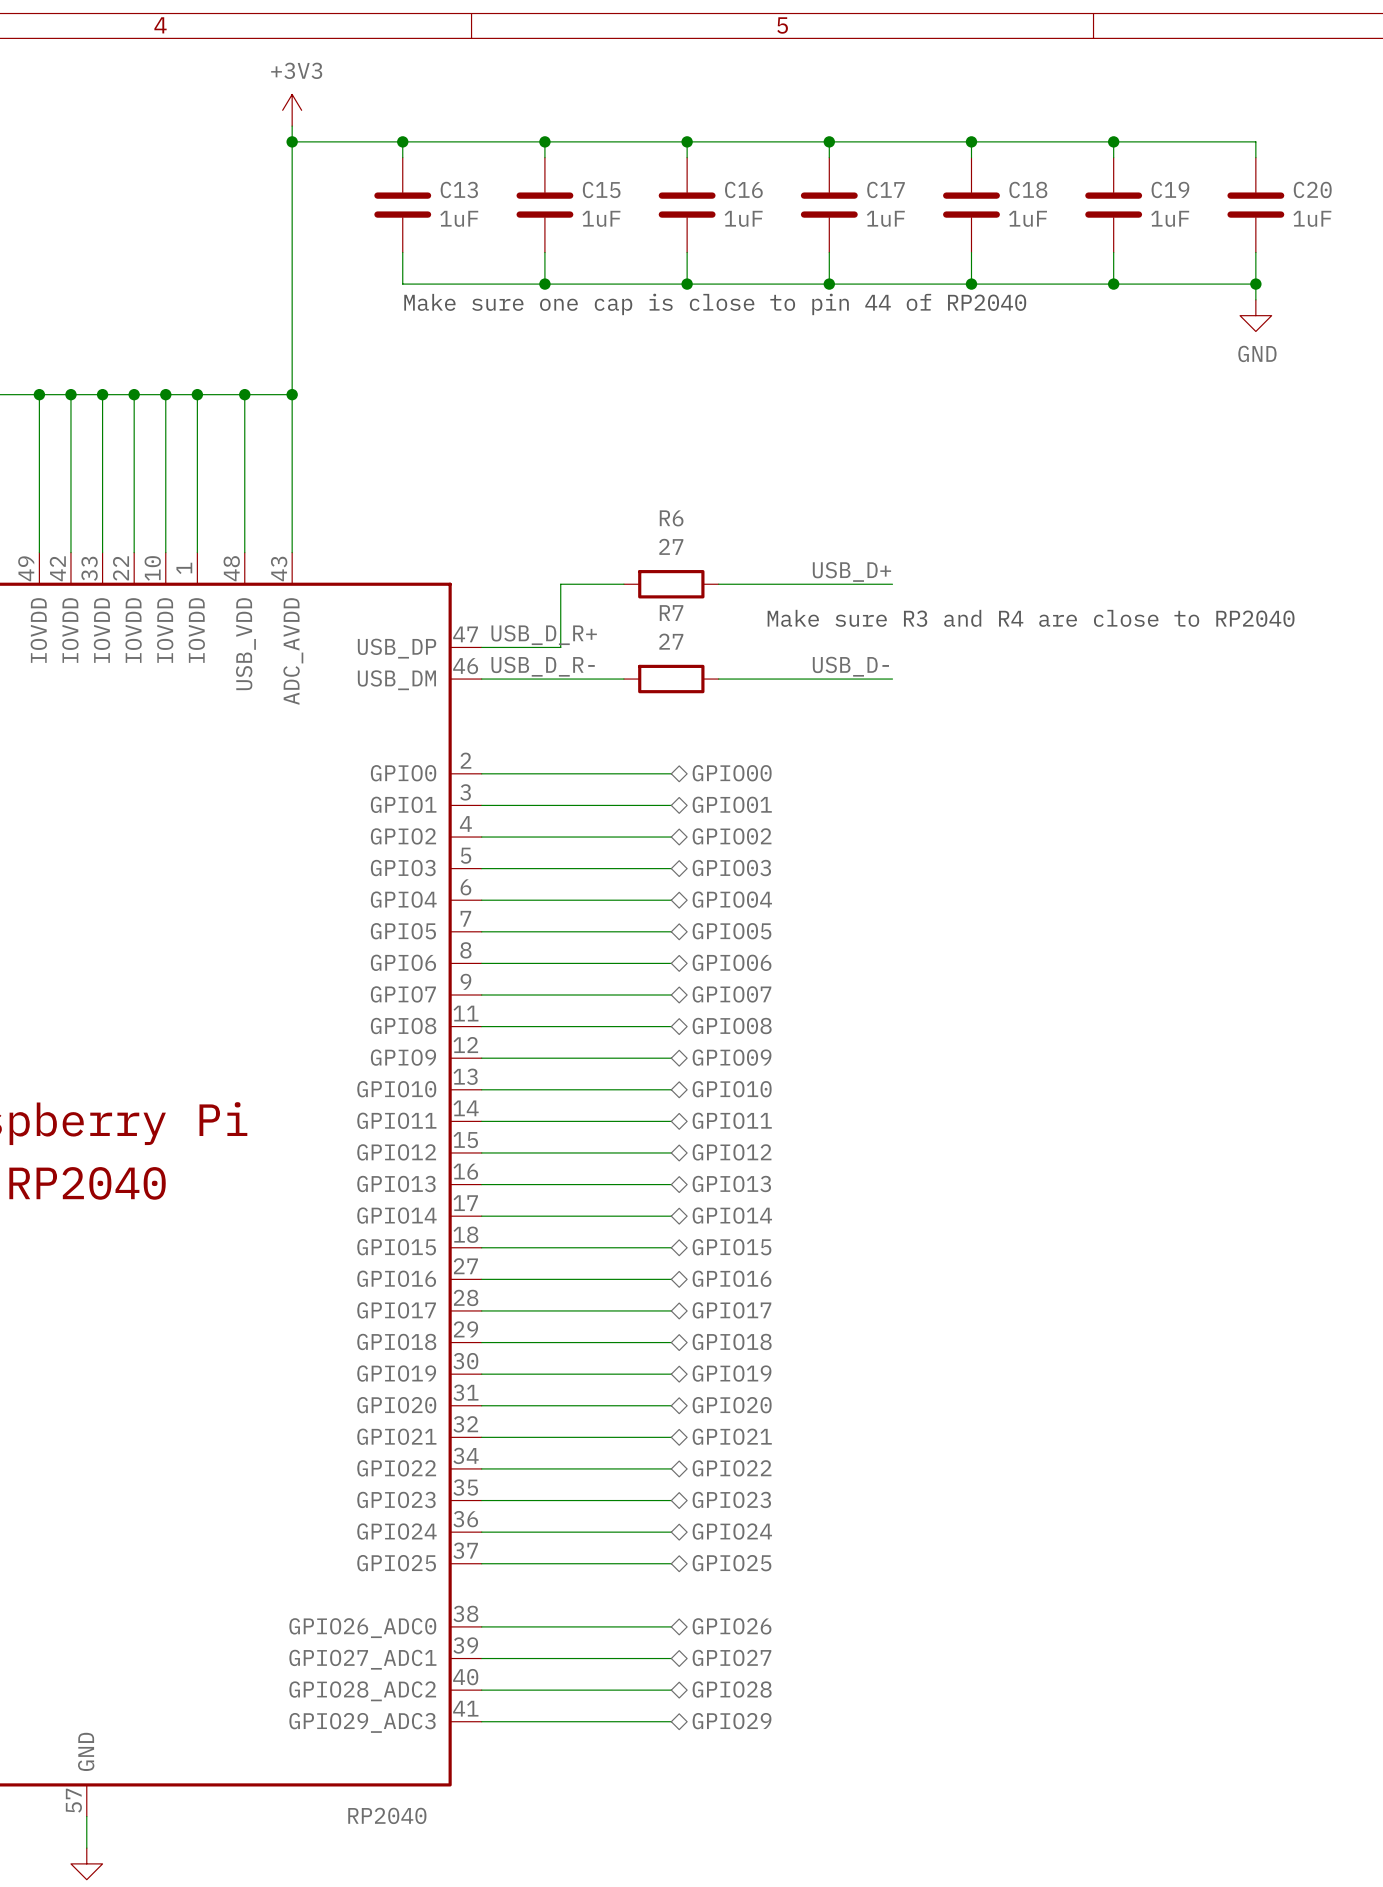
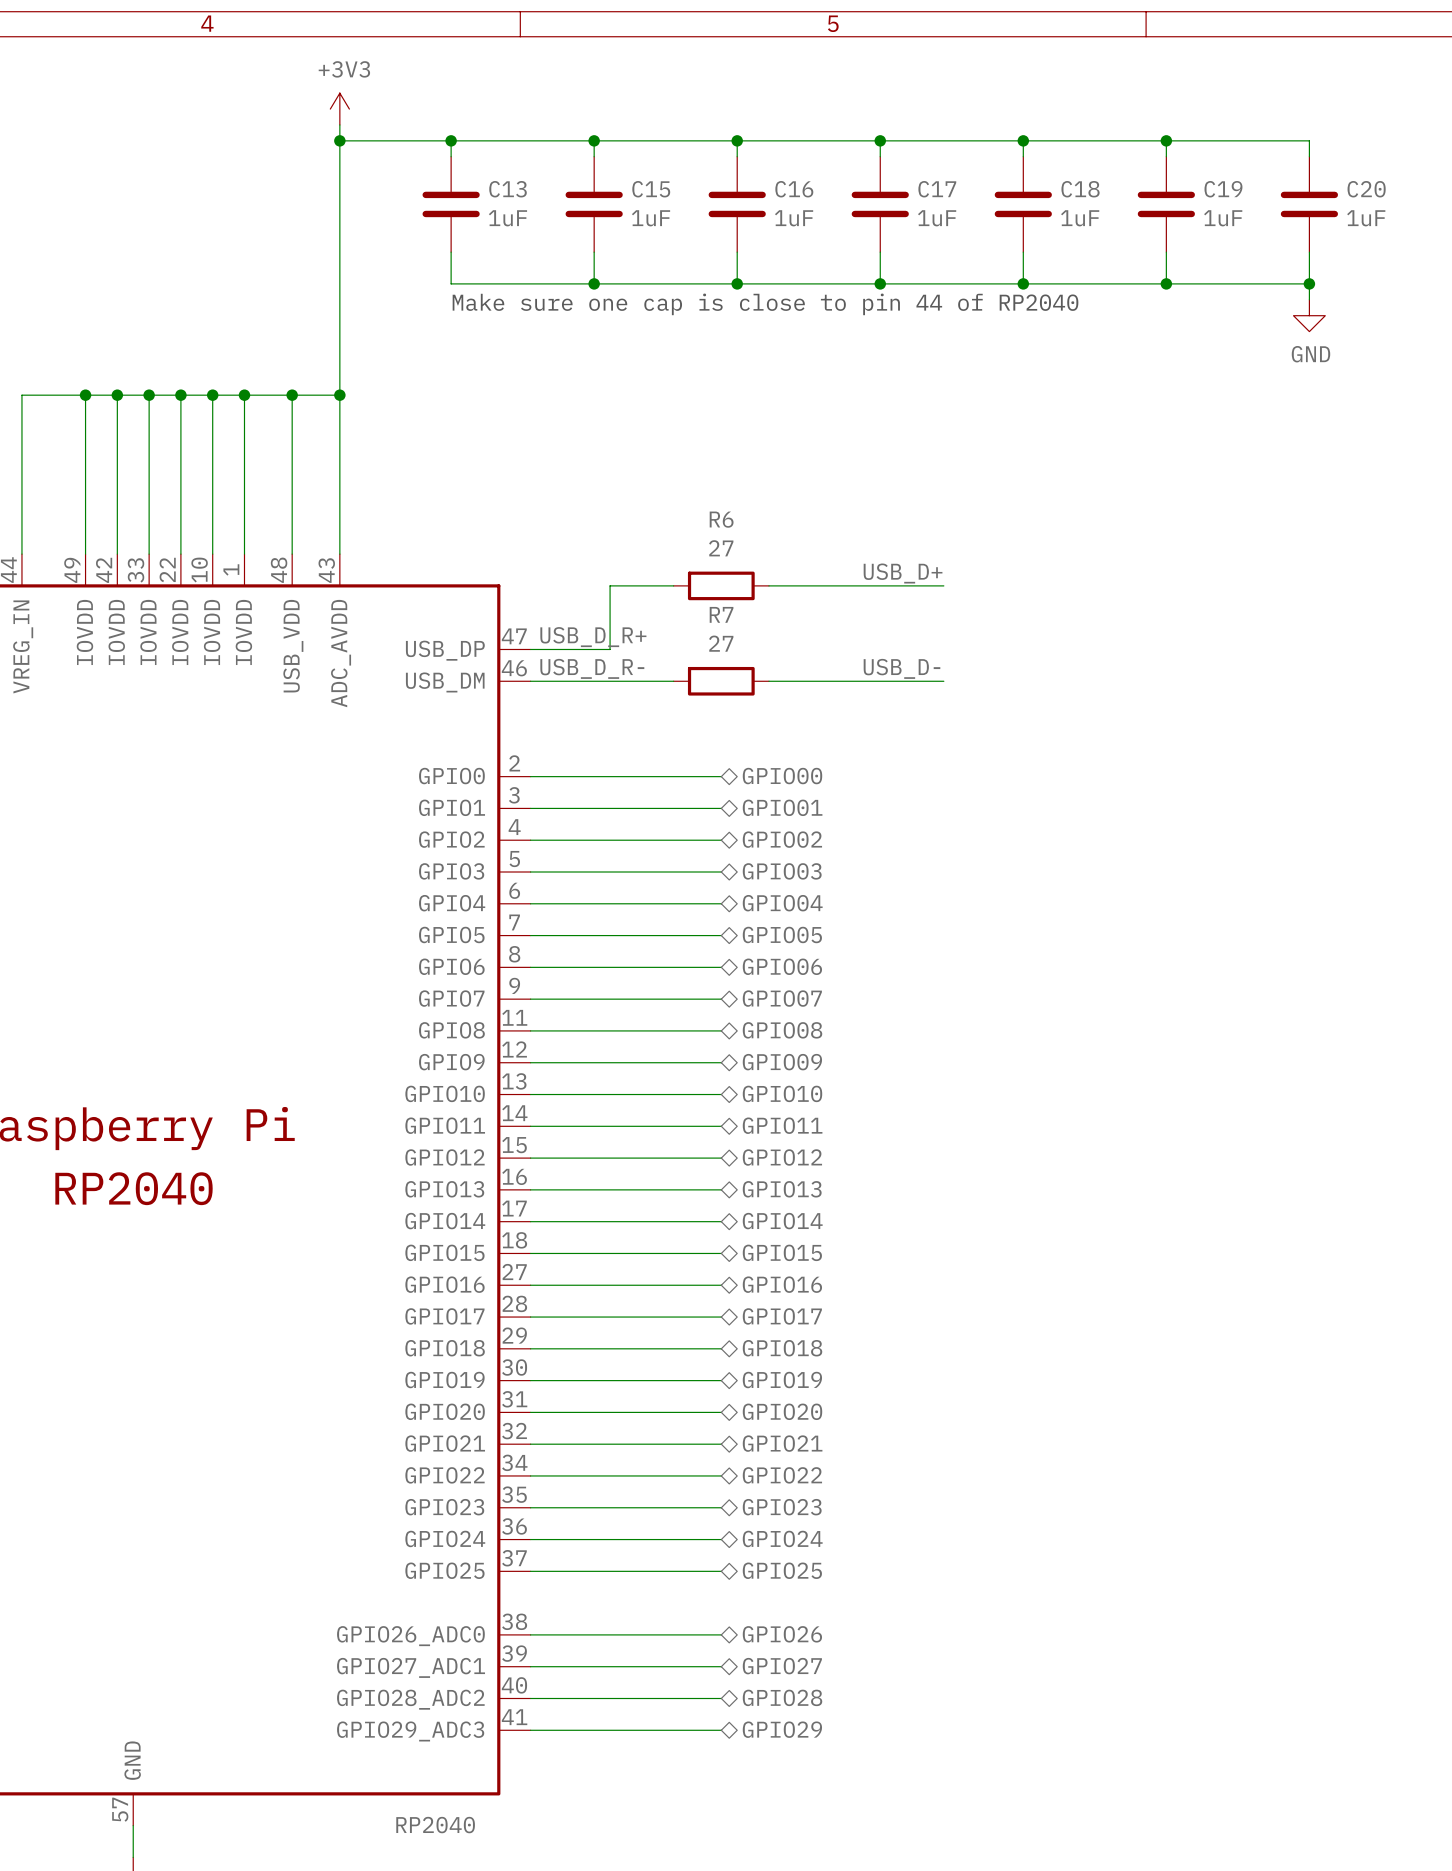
text: Make sure R3 and R4 are close to RP2040 (1031, 618) -> none

